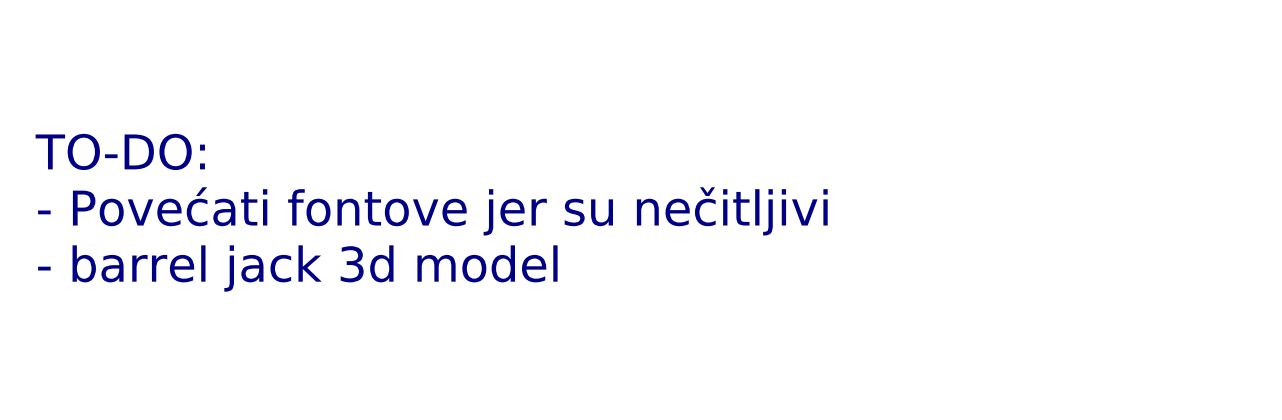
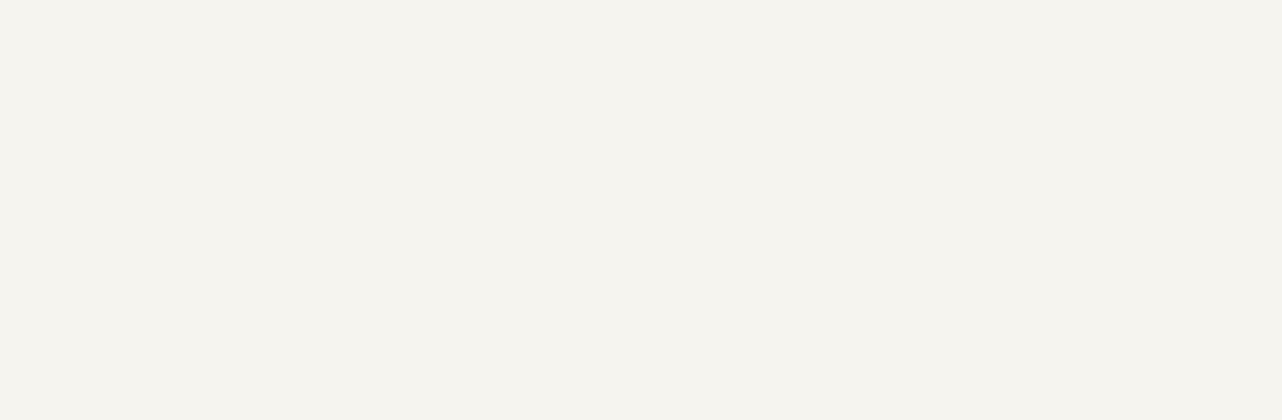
text: TO-DO: (120, 151) -> none
text: - Povećati fontove jer su nečitljivi (432, 211) -> none
text: - barrel jack 3d model (297, 268) -> none

